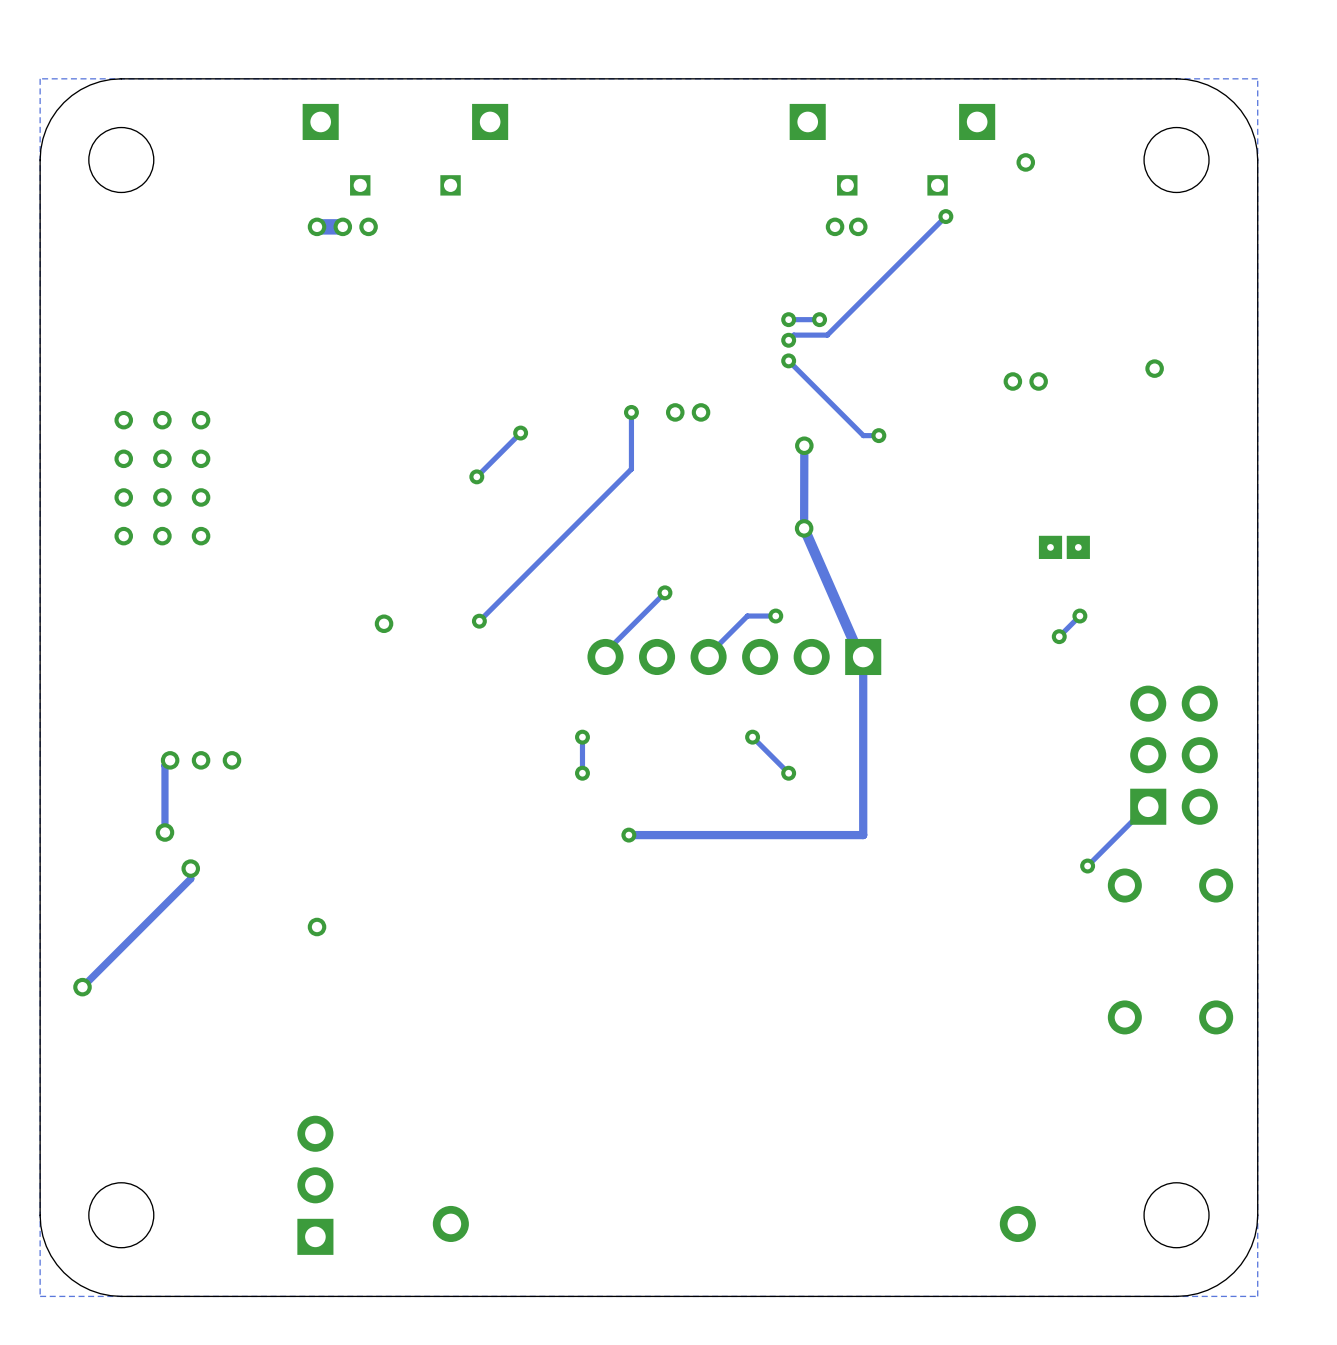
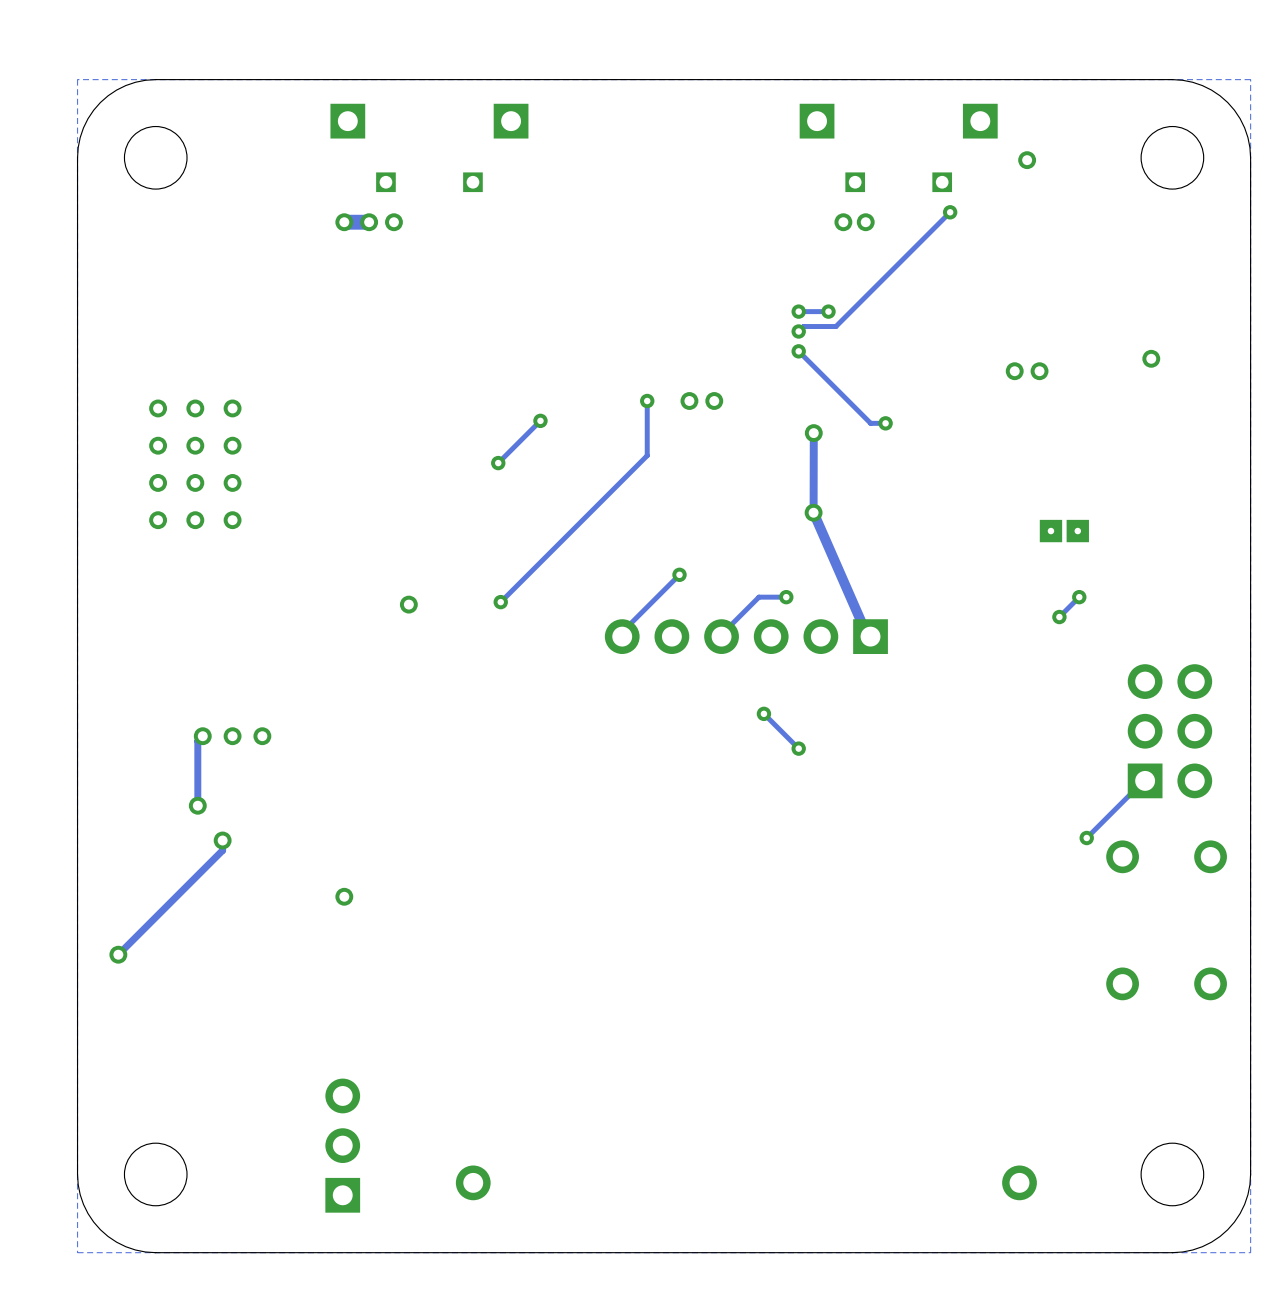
track: (863, 656) (863, 835) (628, 835) -> none
track: (582, 737) (582, 773) -> none
via: (582, 737) -> none
via: (582, 773) -> none
via: (628, 835) -> none

